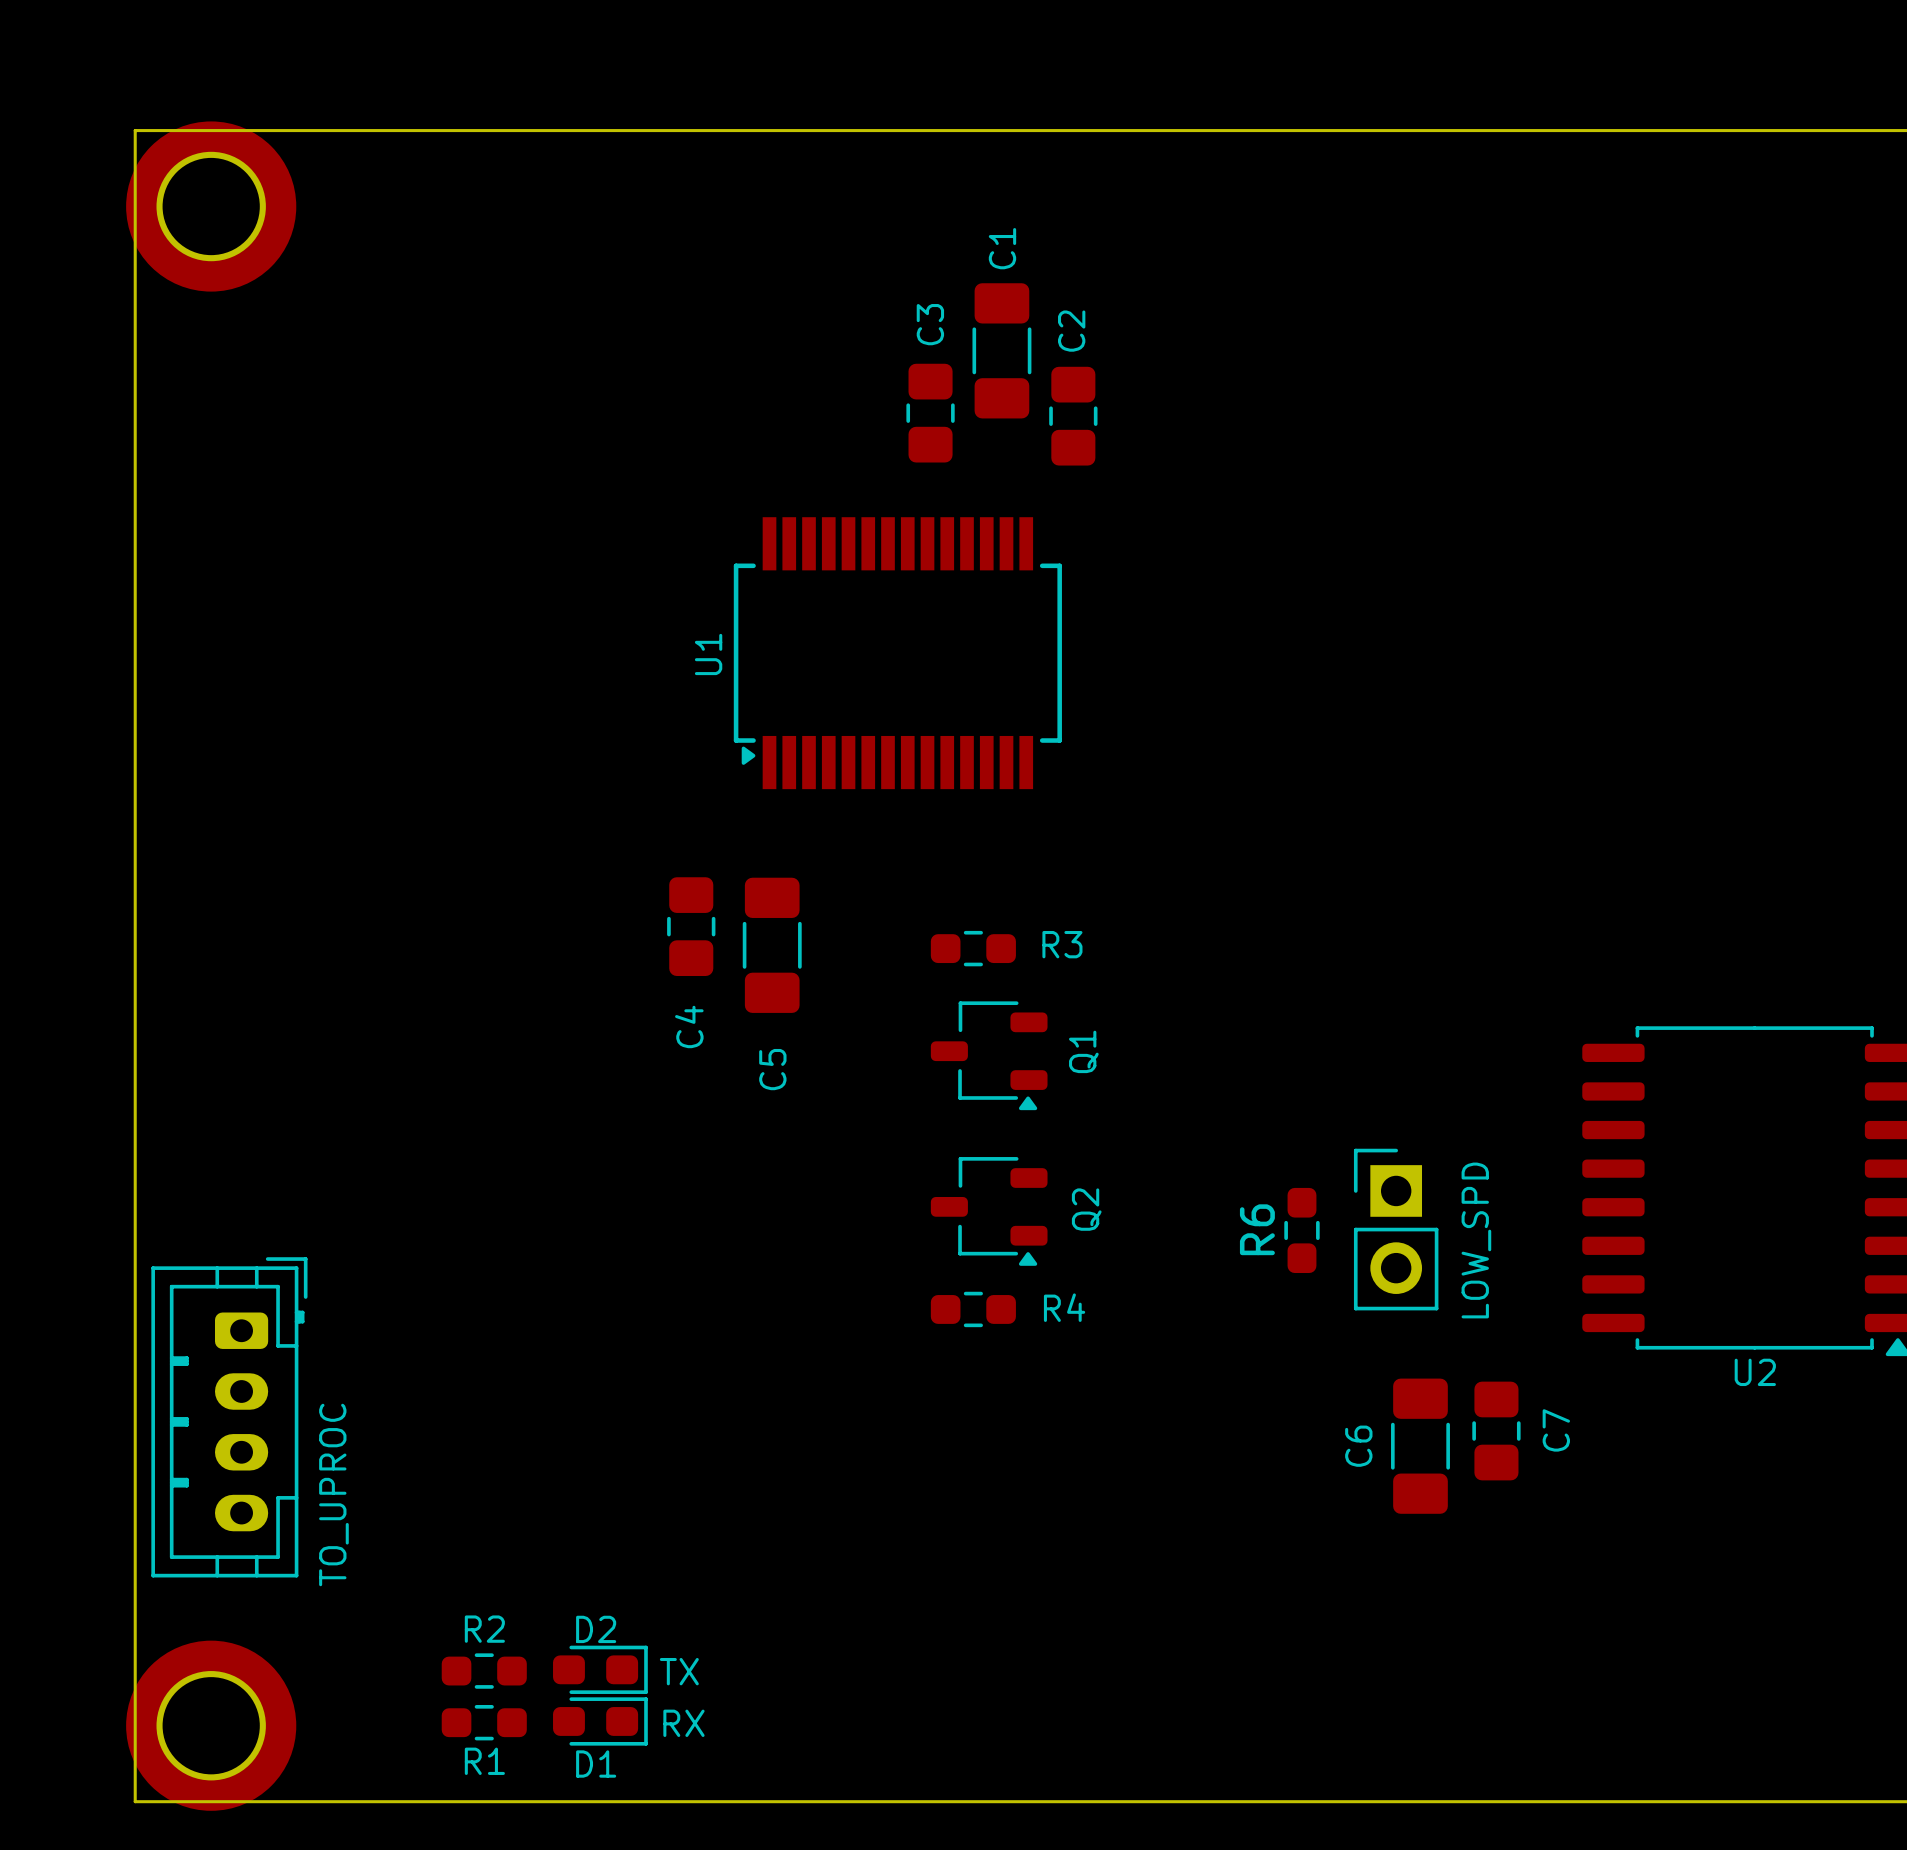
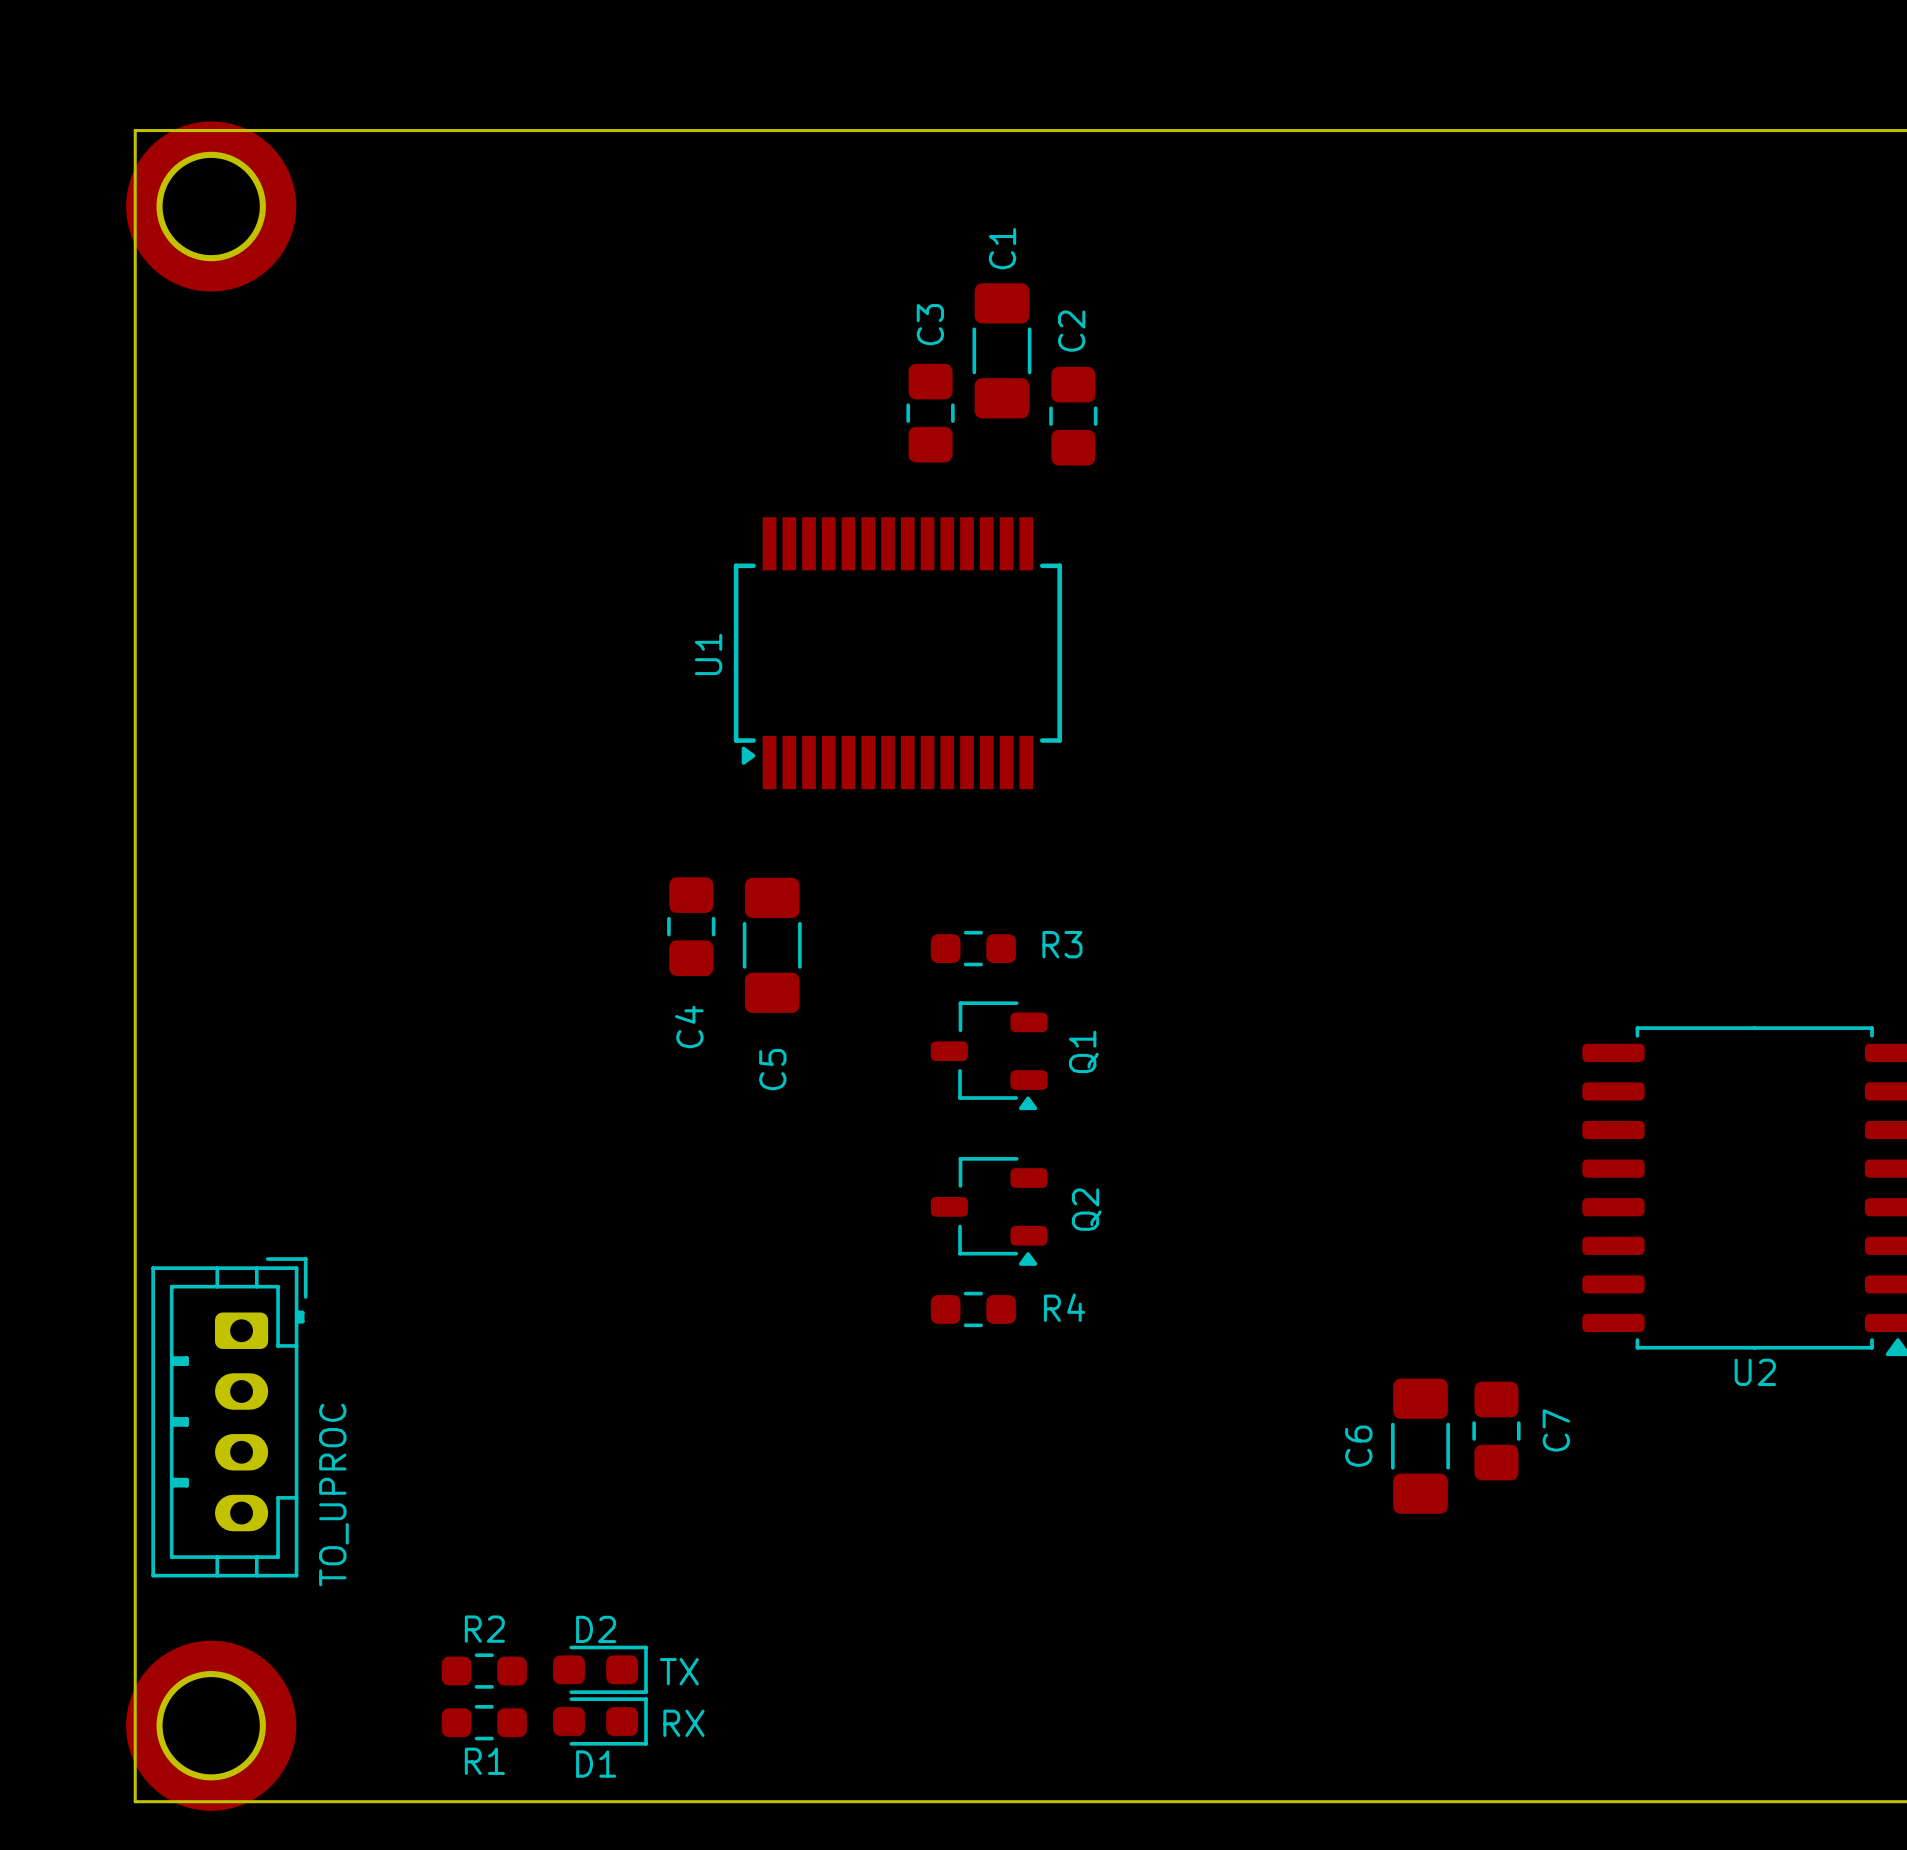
part: (1396, 1229) -> none
R6: (1301, 1230) -> none
text: LOW_SPD (1476, 1240) -> none

